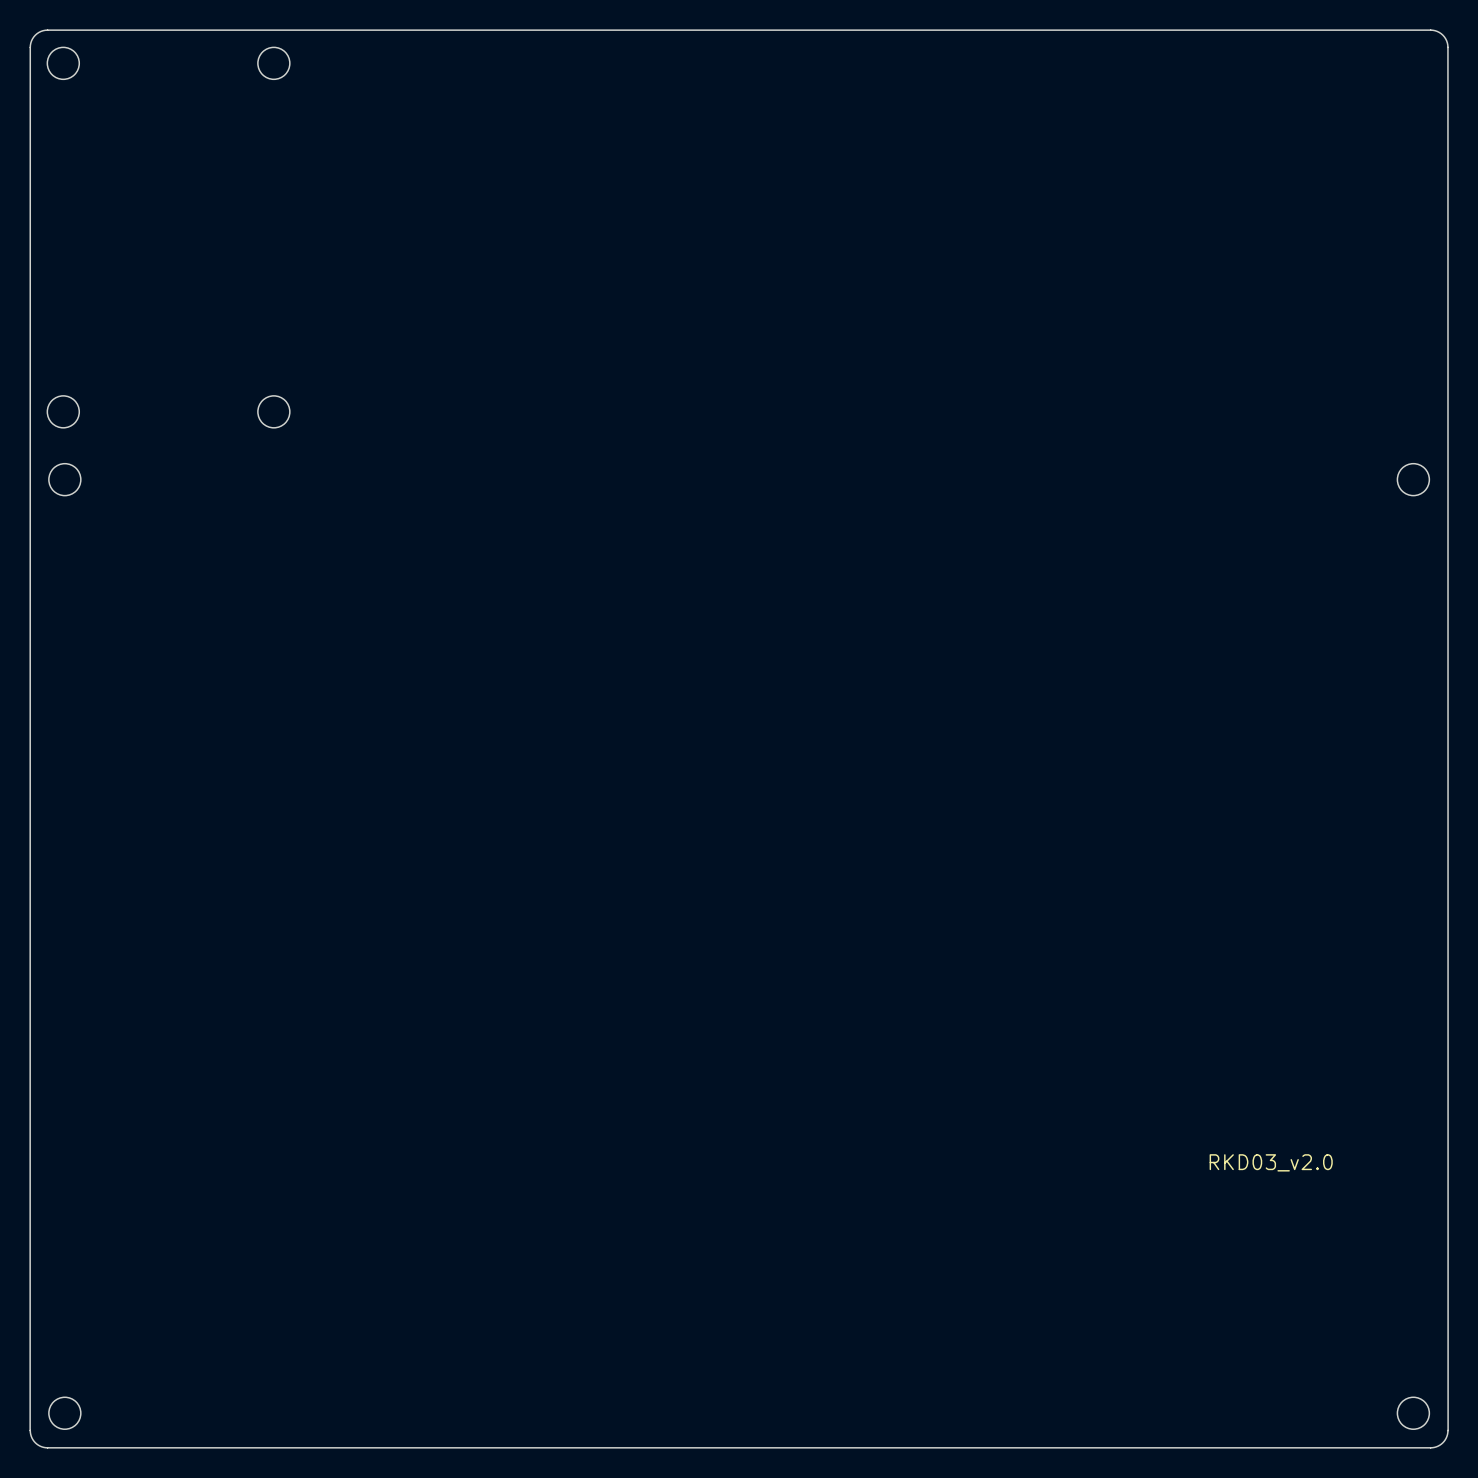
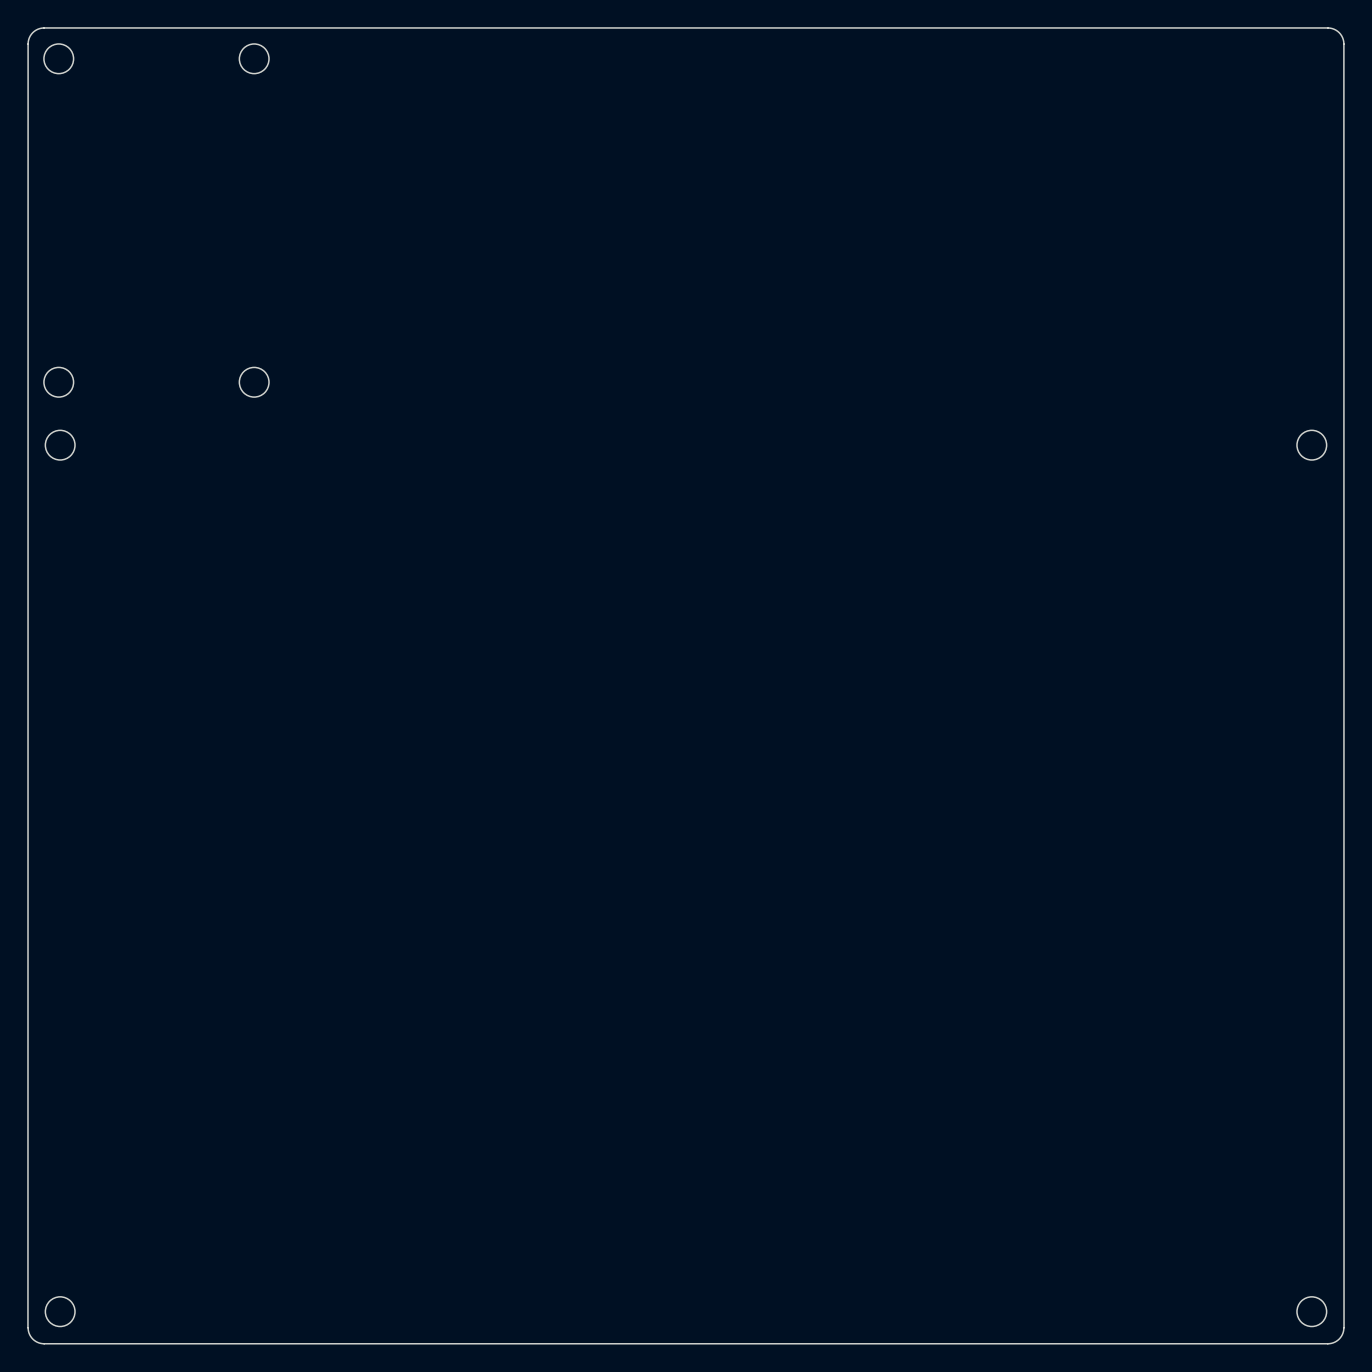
text: RKD03_v2.0 (1271, 1162) -> none

